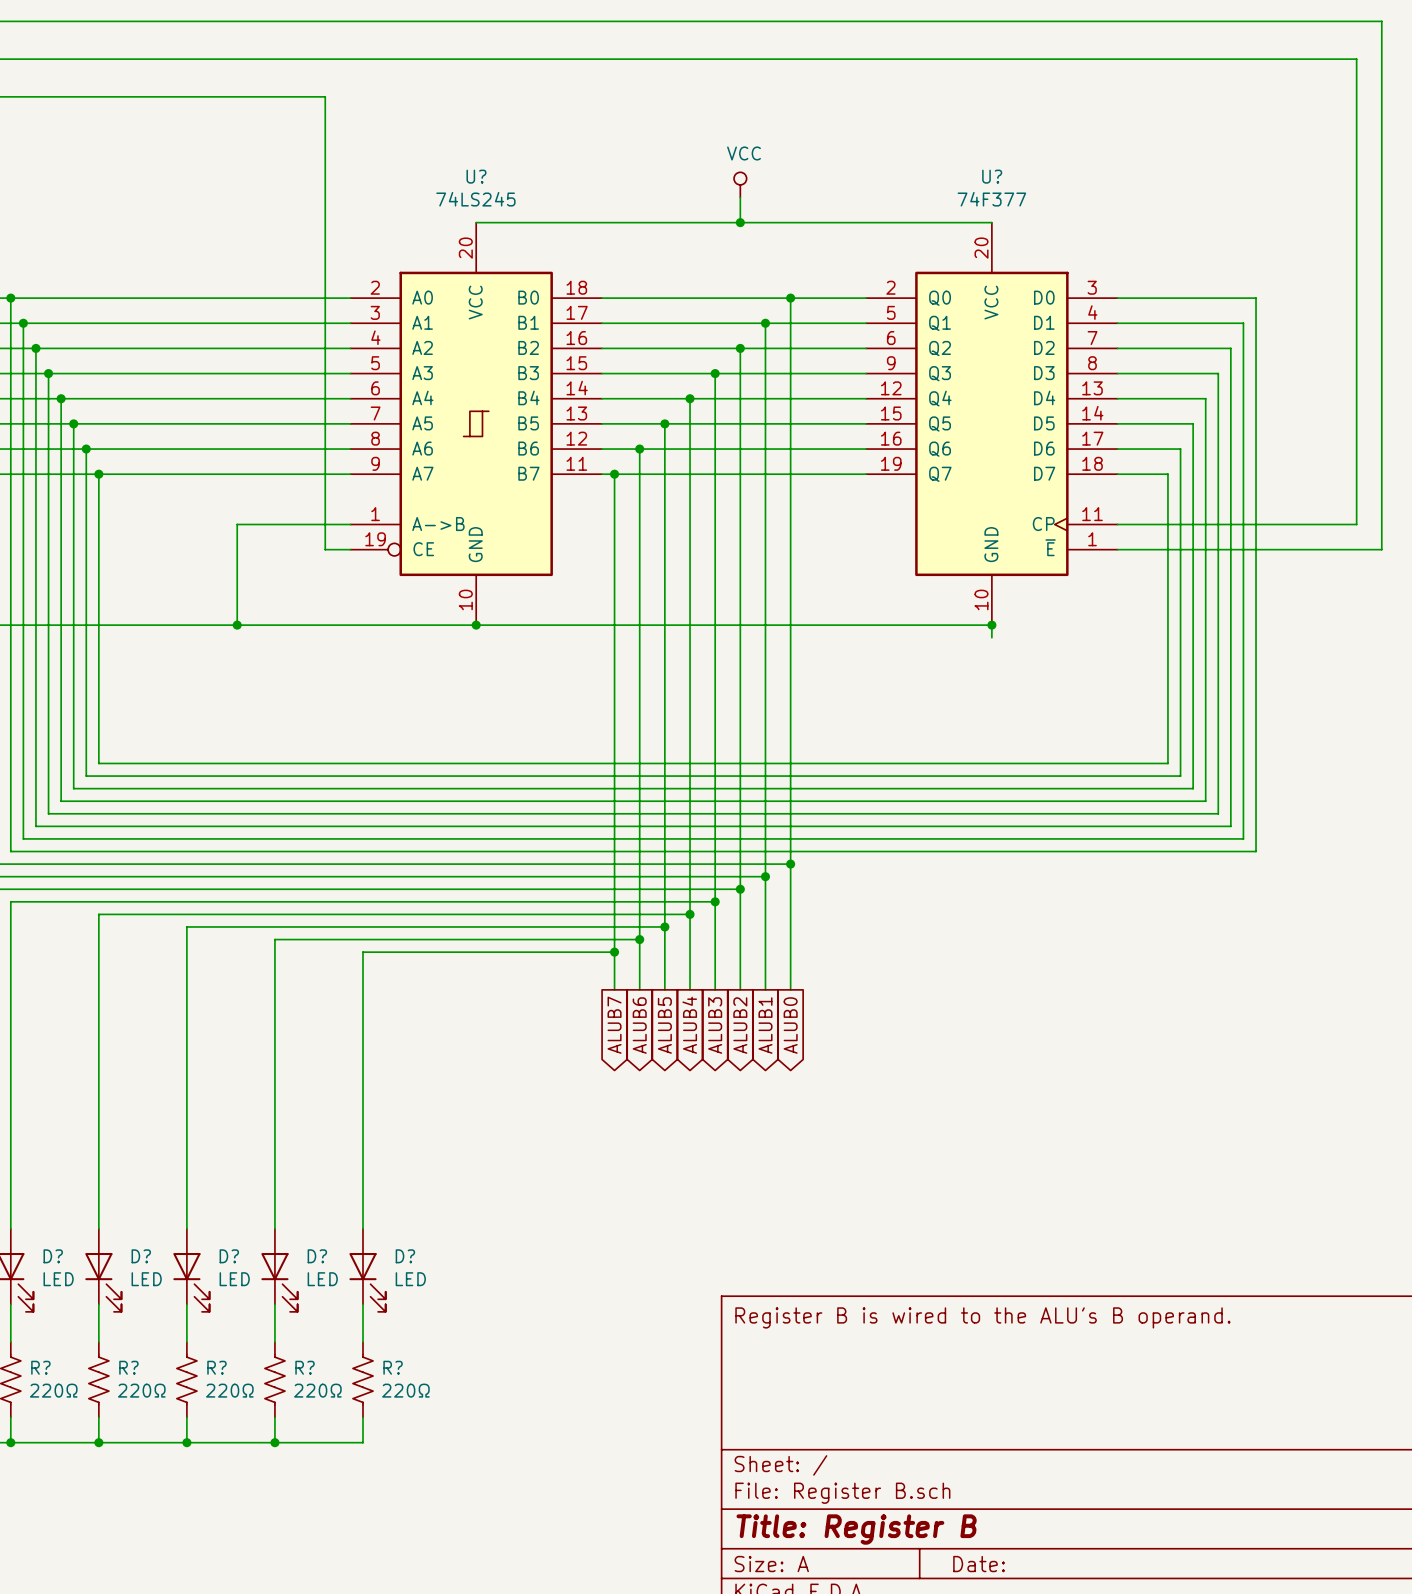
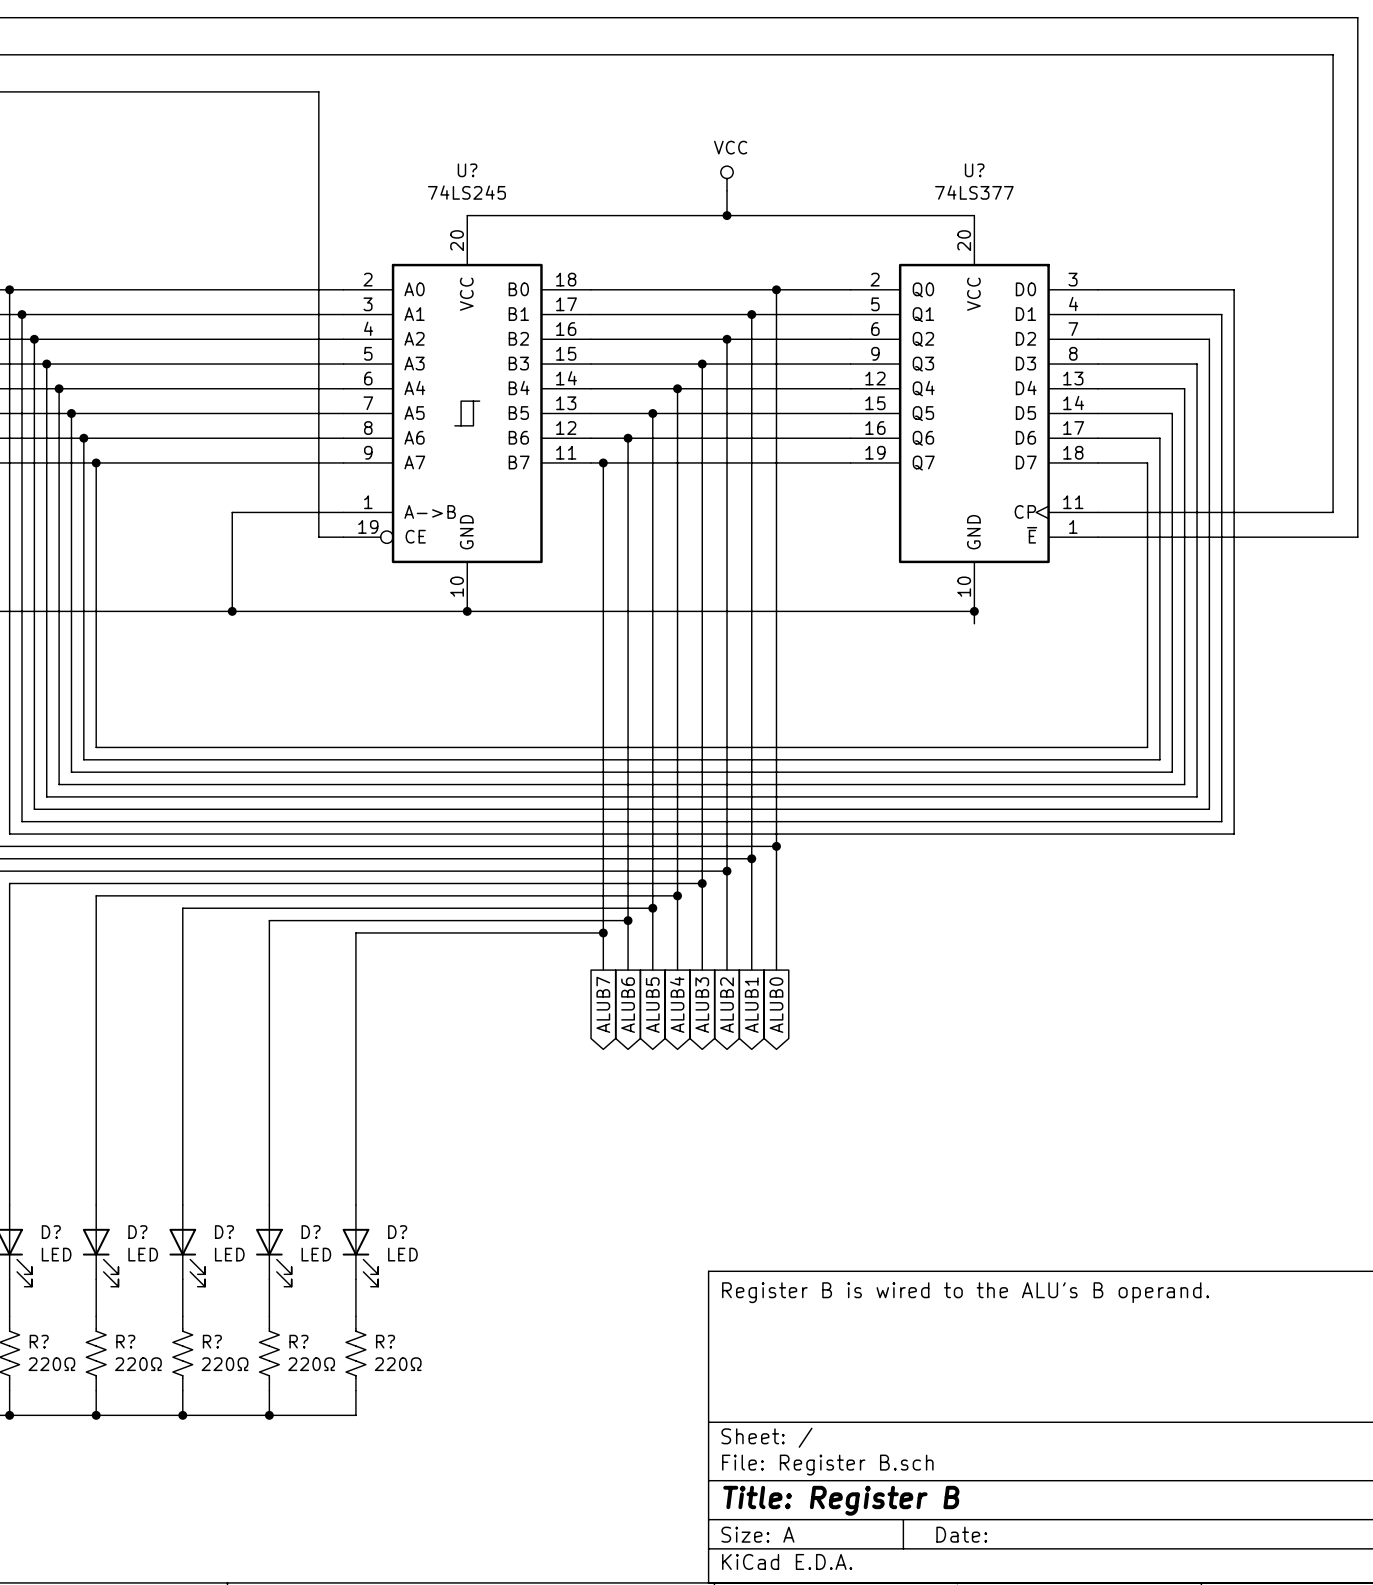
U? value: 74F377 (991, 199) -> 74LS377 (974, 192)

